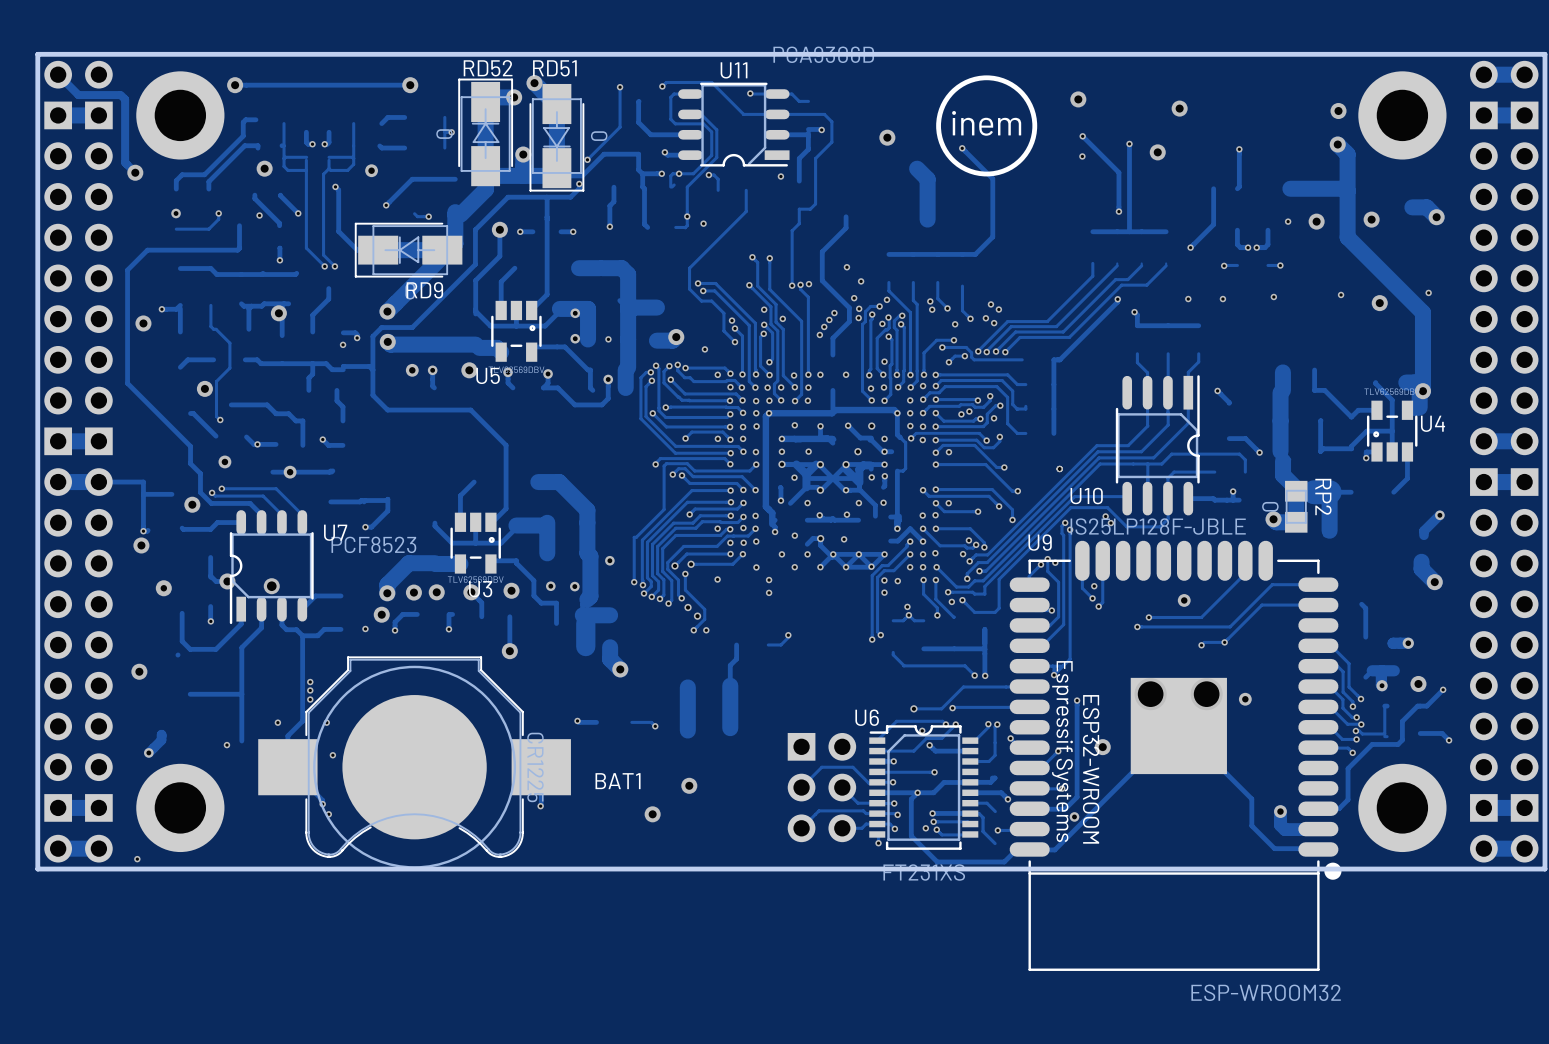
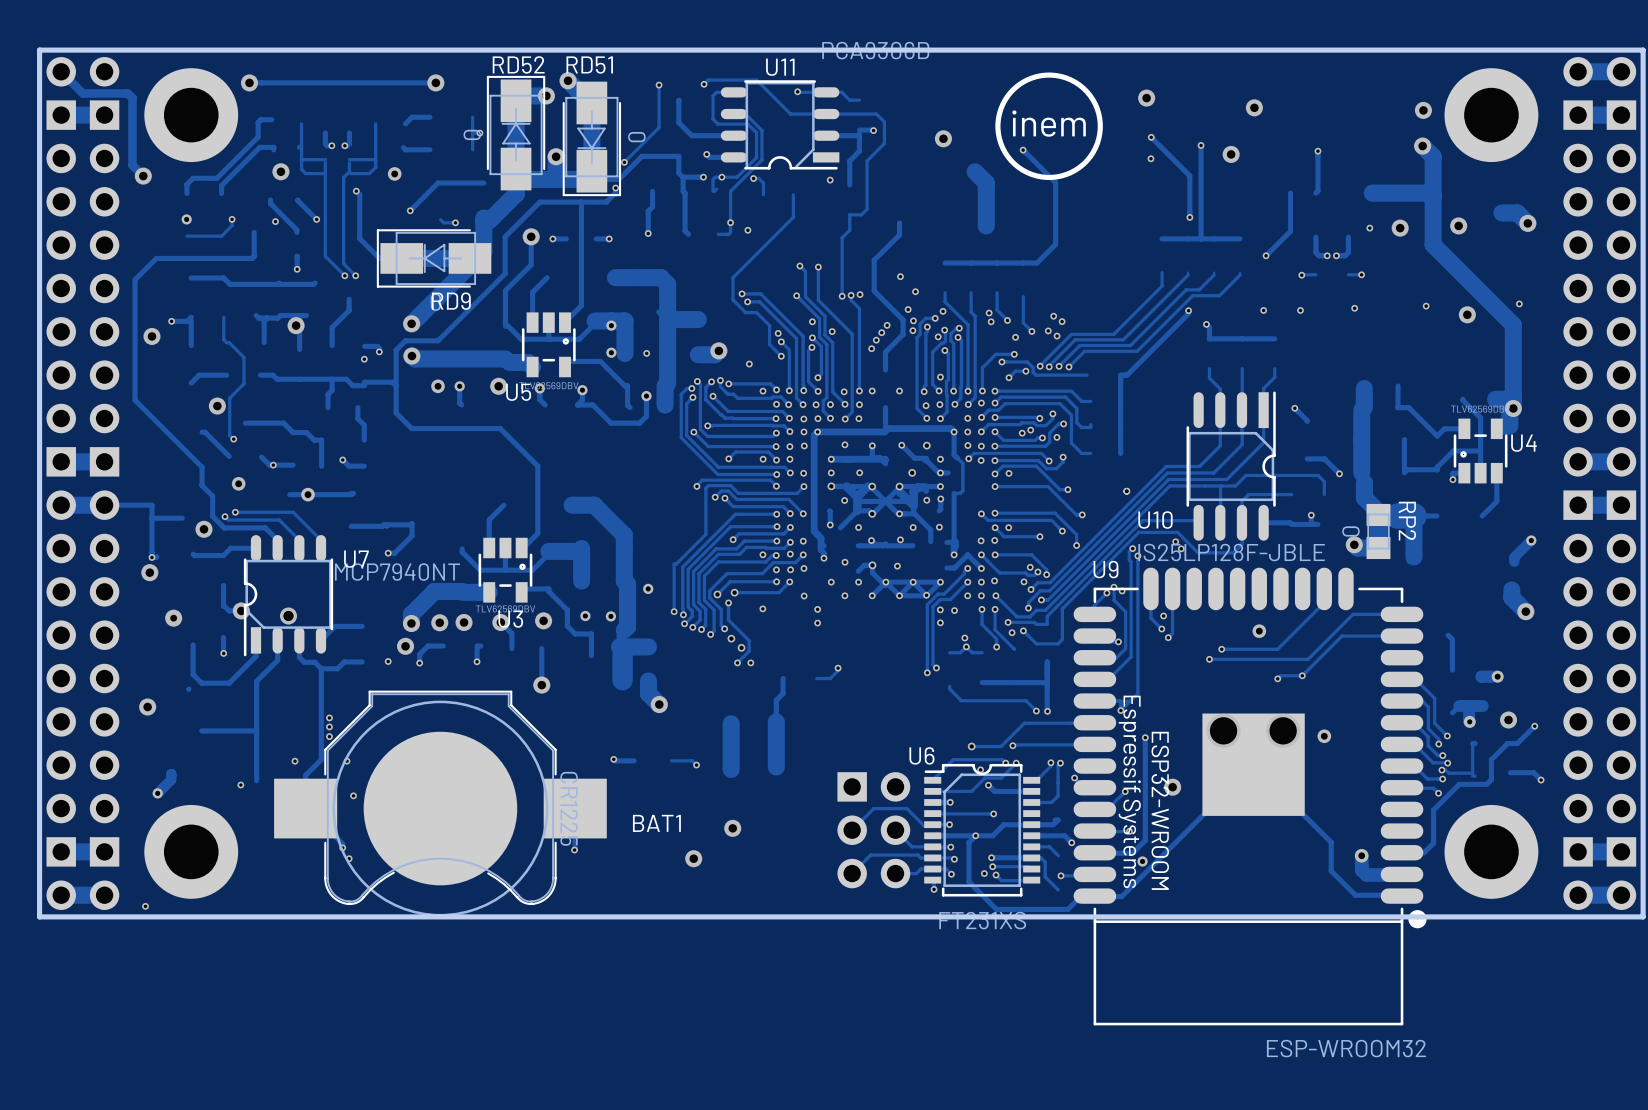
U7 value: PCF8523 (373, 544) -> MCP7940NT (397, 572)

